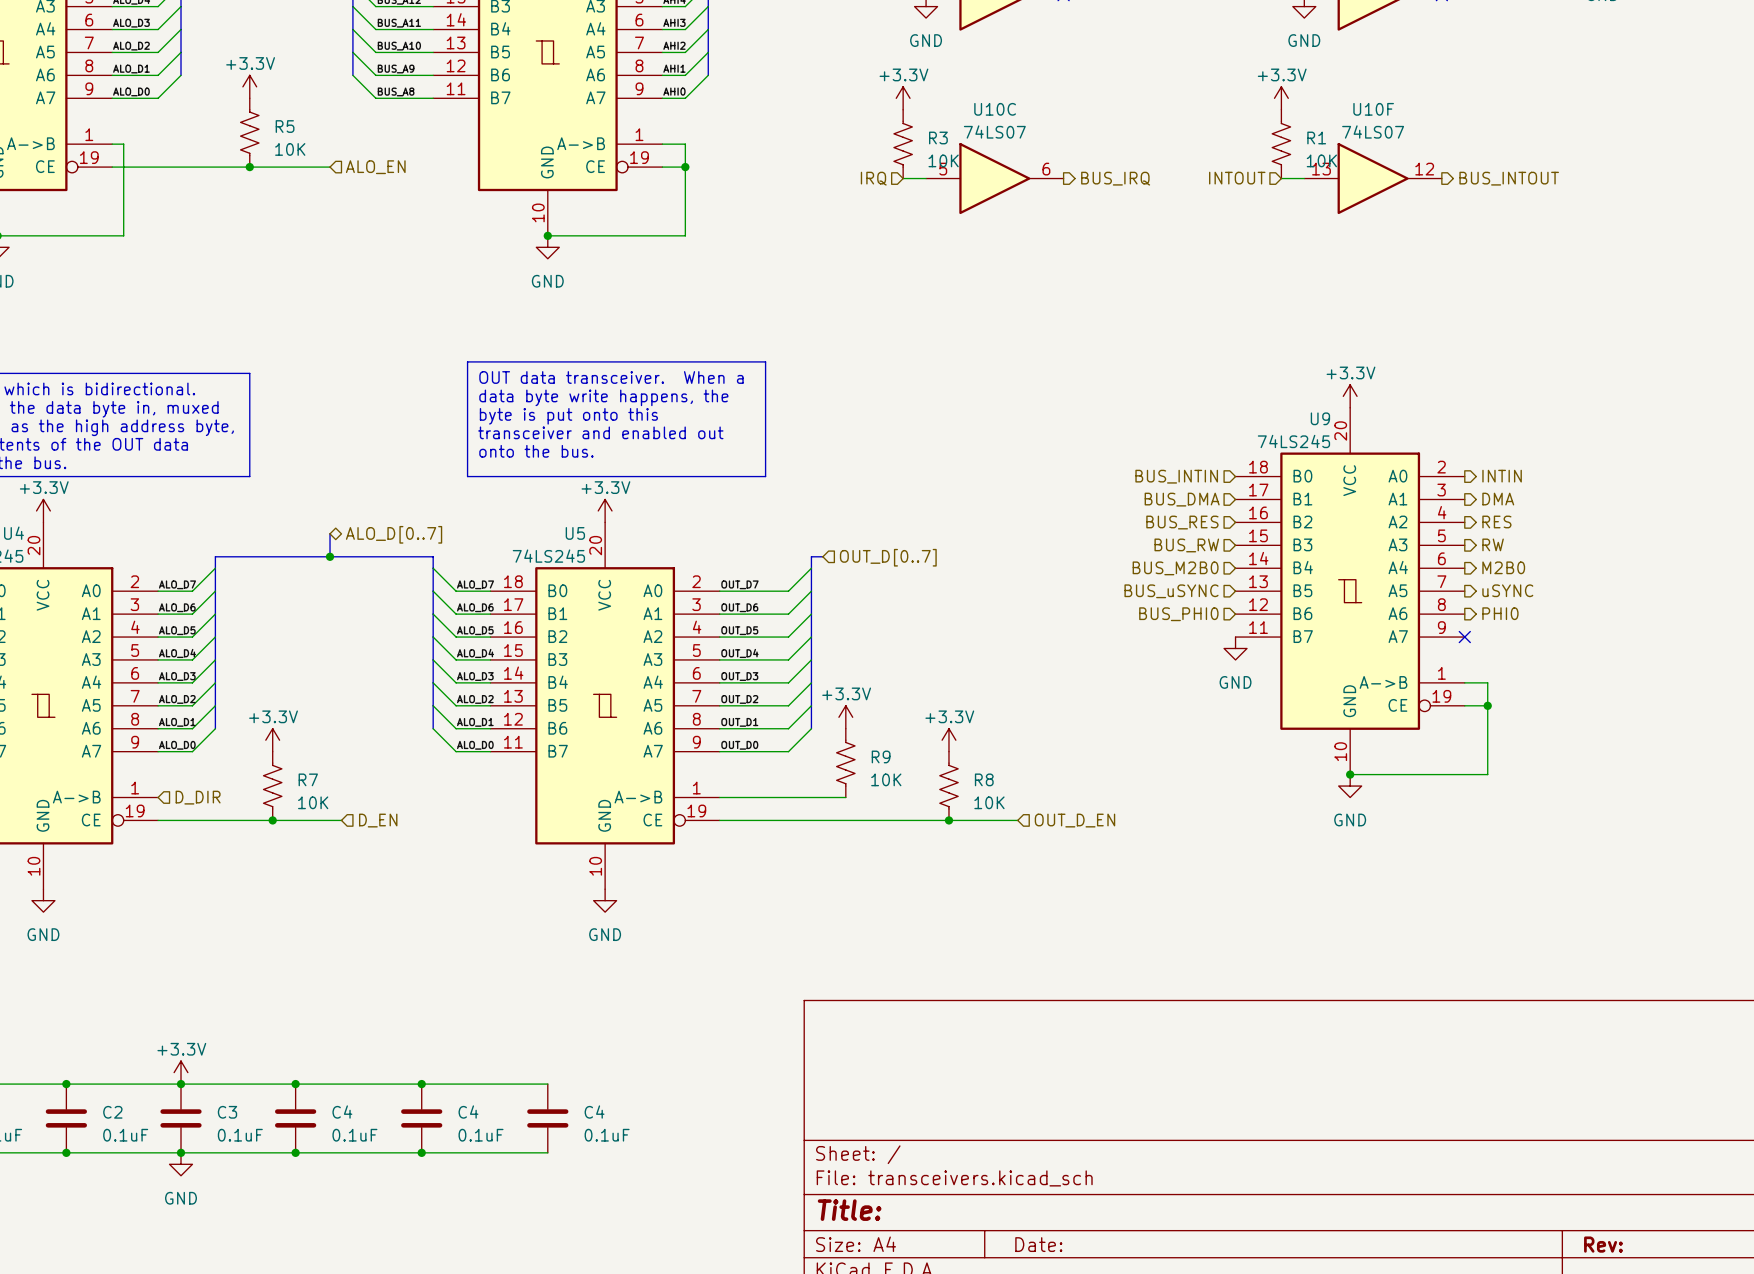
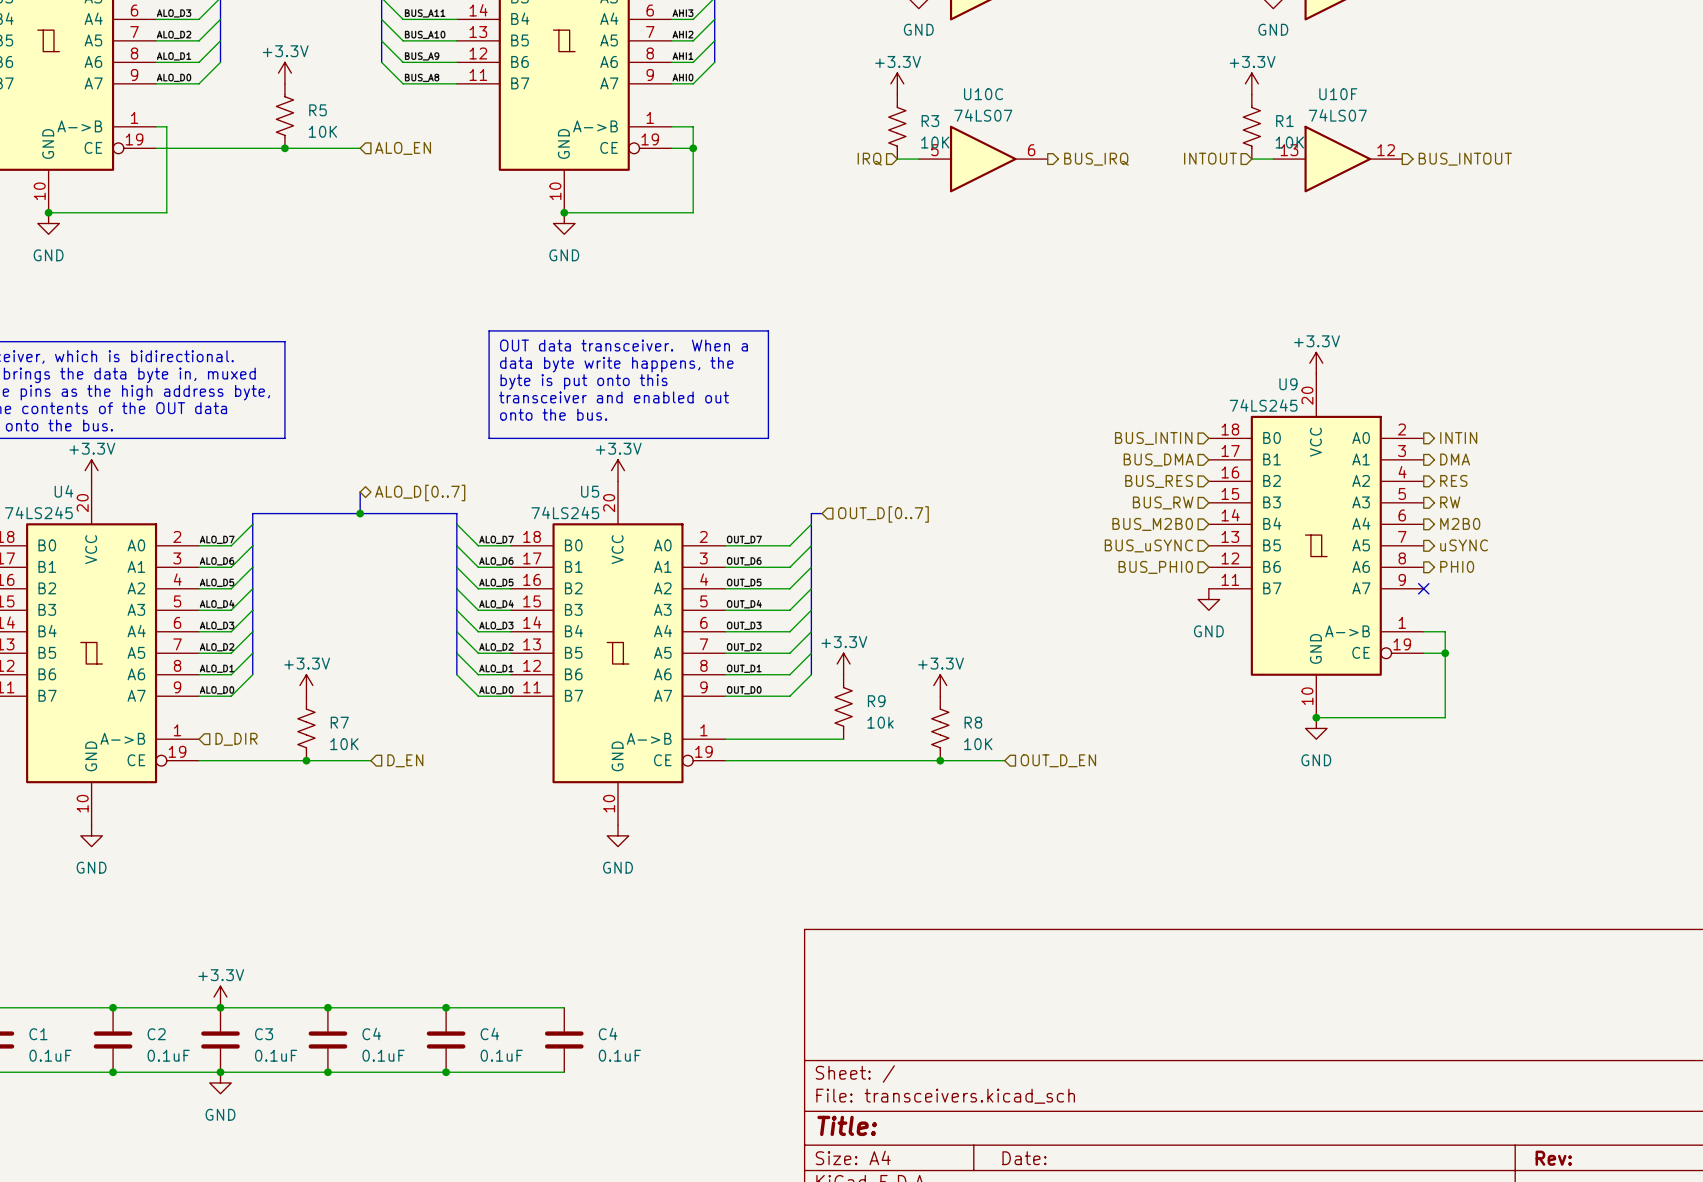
R9 value: 10K (886, 779) -> 10k (880, 722)

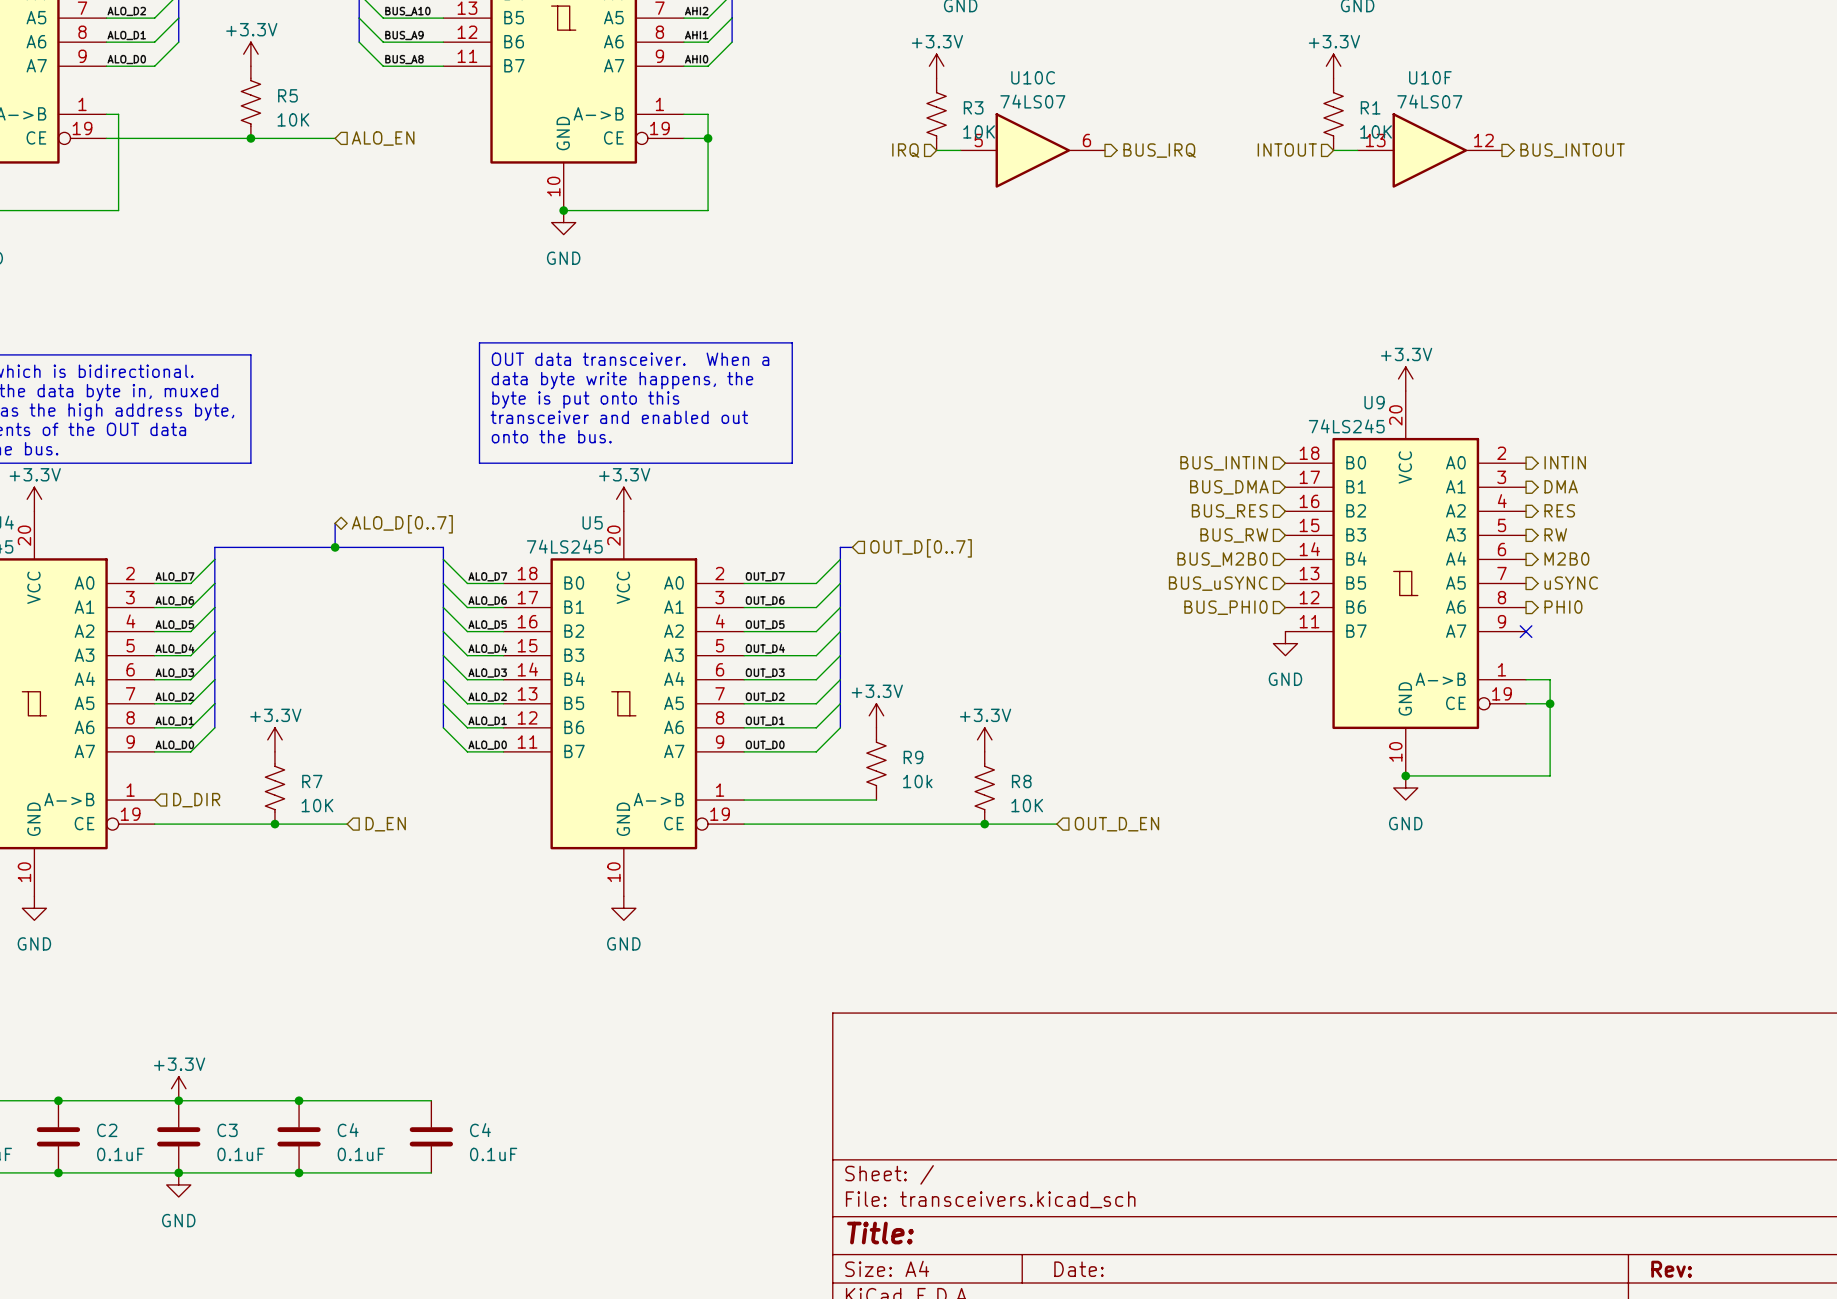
wire: (446, 1007) (564, 1007) -> none
junction: (446, 1007) -> none
C4: 0.1uF (564, 1040) -> none
wire: (446, 1072) (564, 1072) -> none
junction: (446, 1072) -> none

